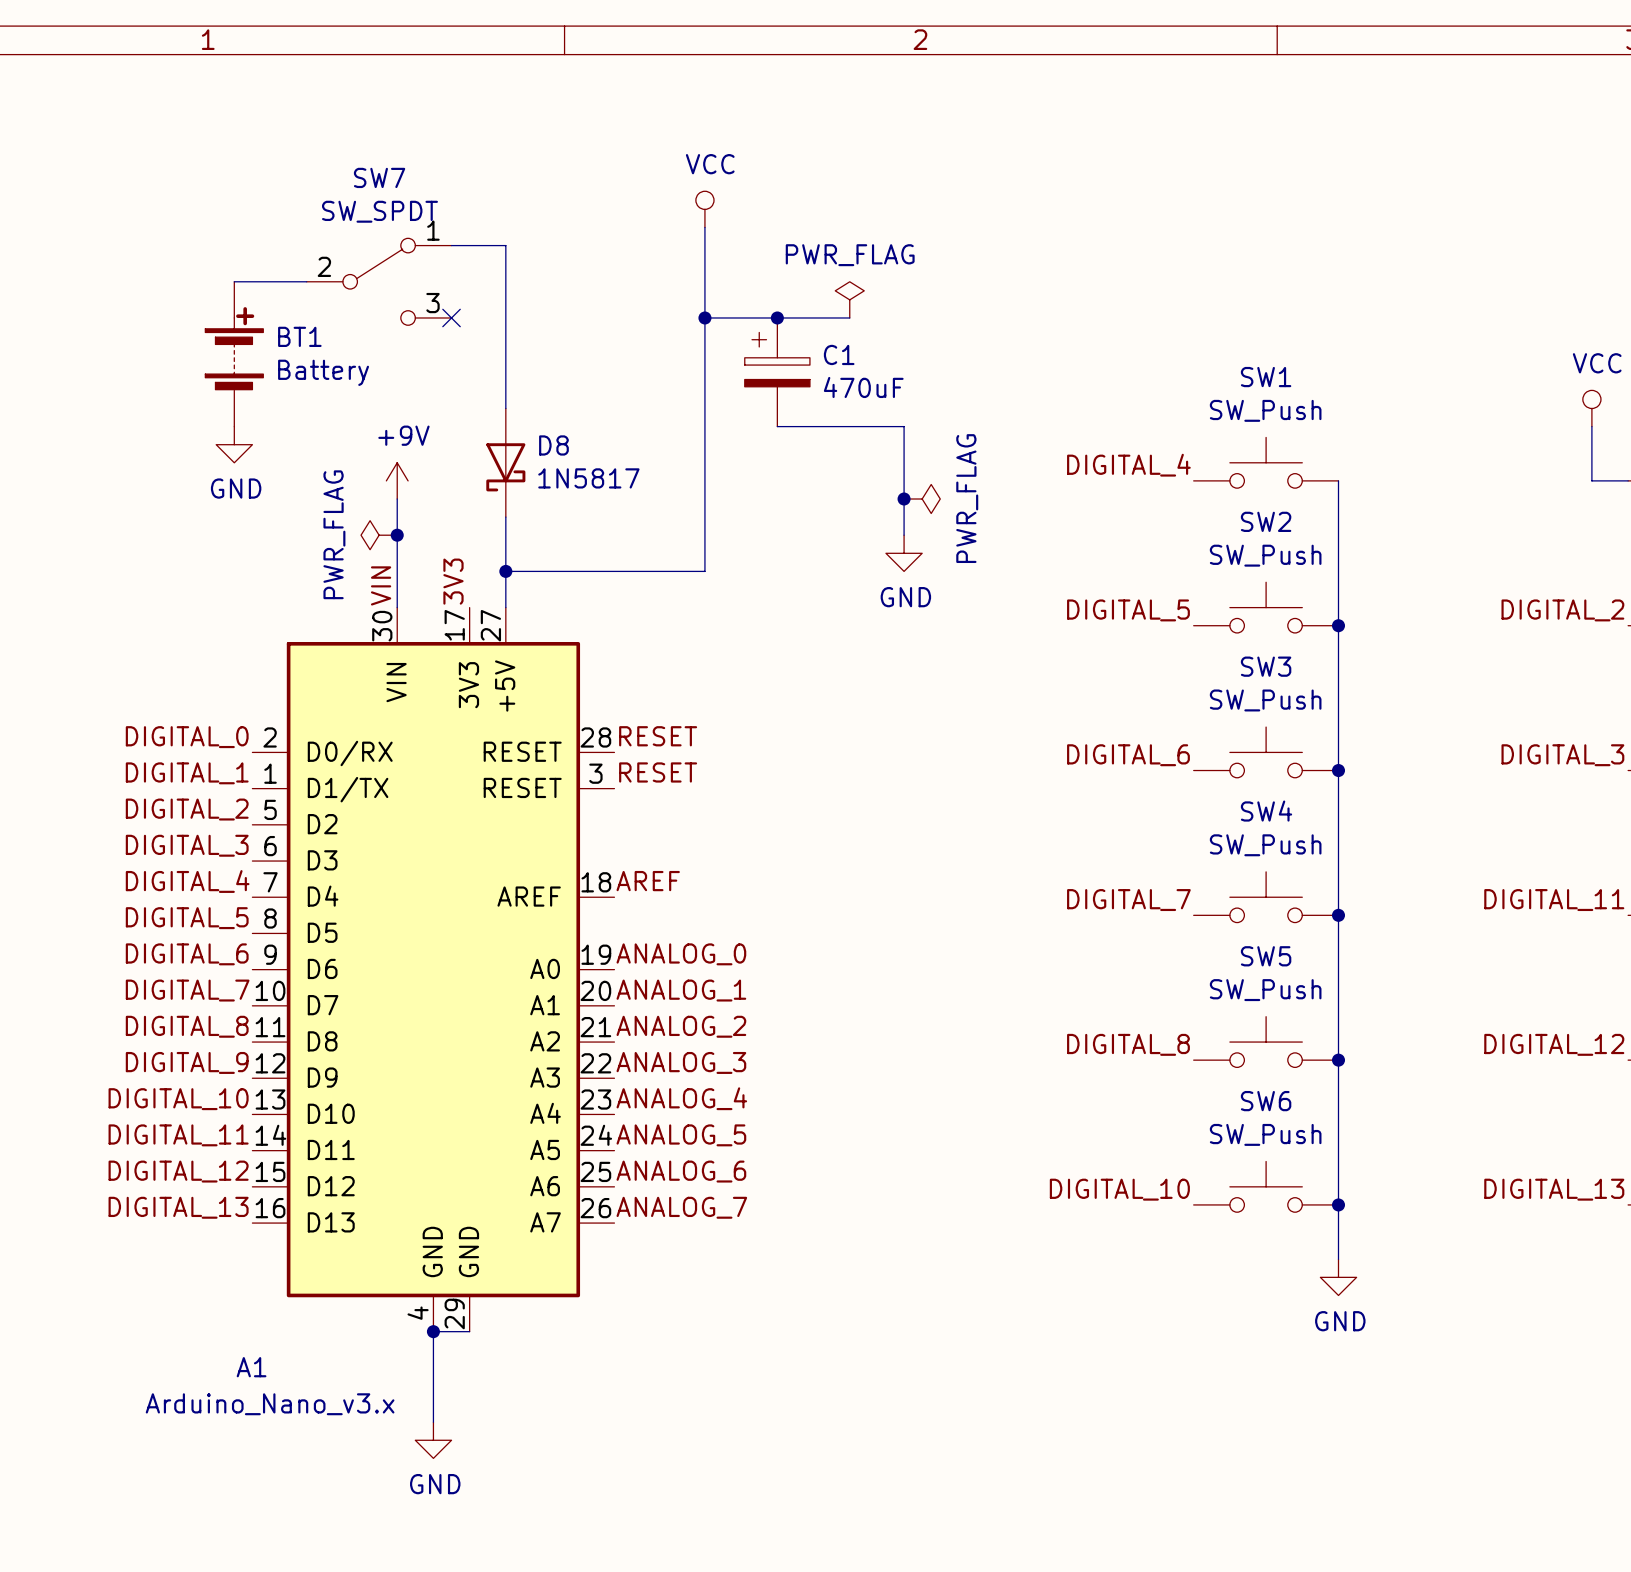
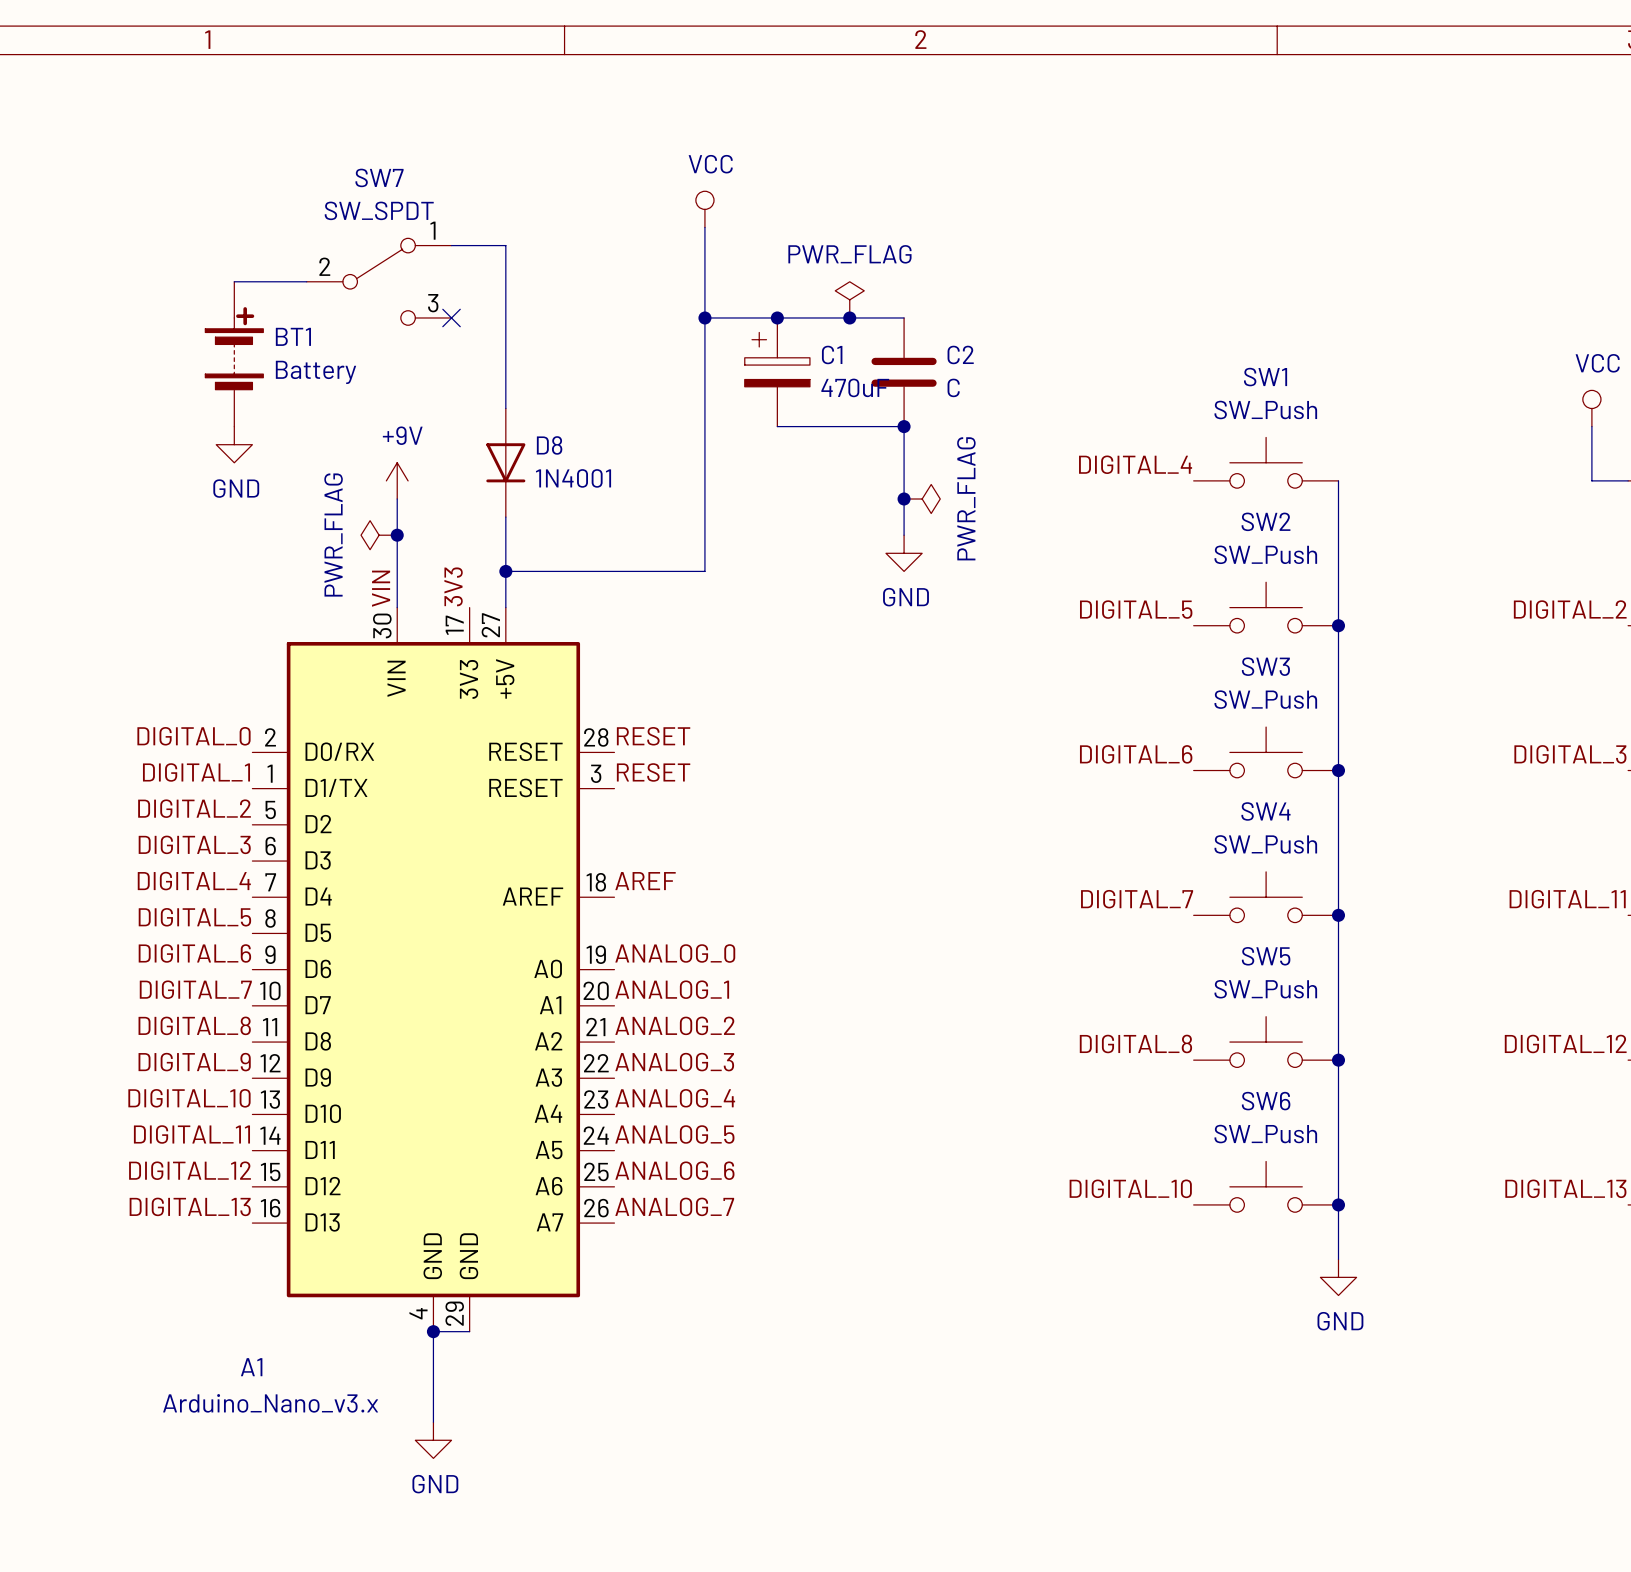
wire: none -> (849, 317) (904, 317)
junction: none -> (849, 317)
C2: none -> C (904, 372)
D8 symbol: [486, 408, 526, 518] -> [486, 408, 526, 518]
junction: none -> (904, 426)
D8 value: 1N5817 (588, 478) -> 1N4001 (573, 478)

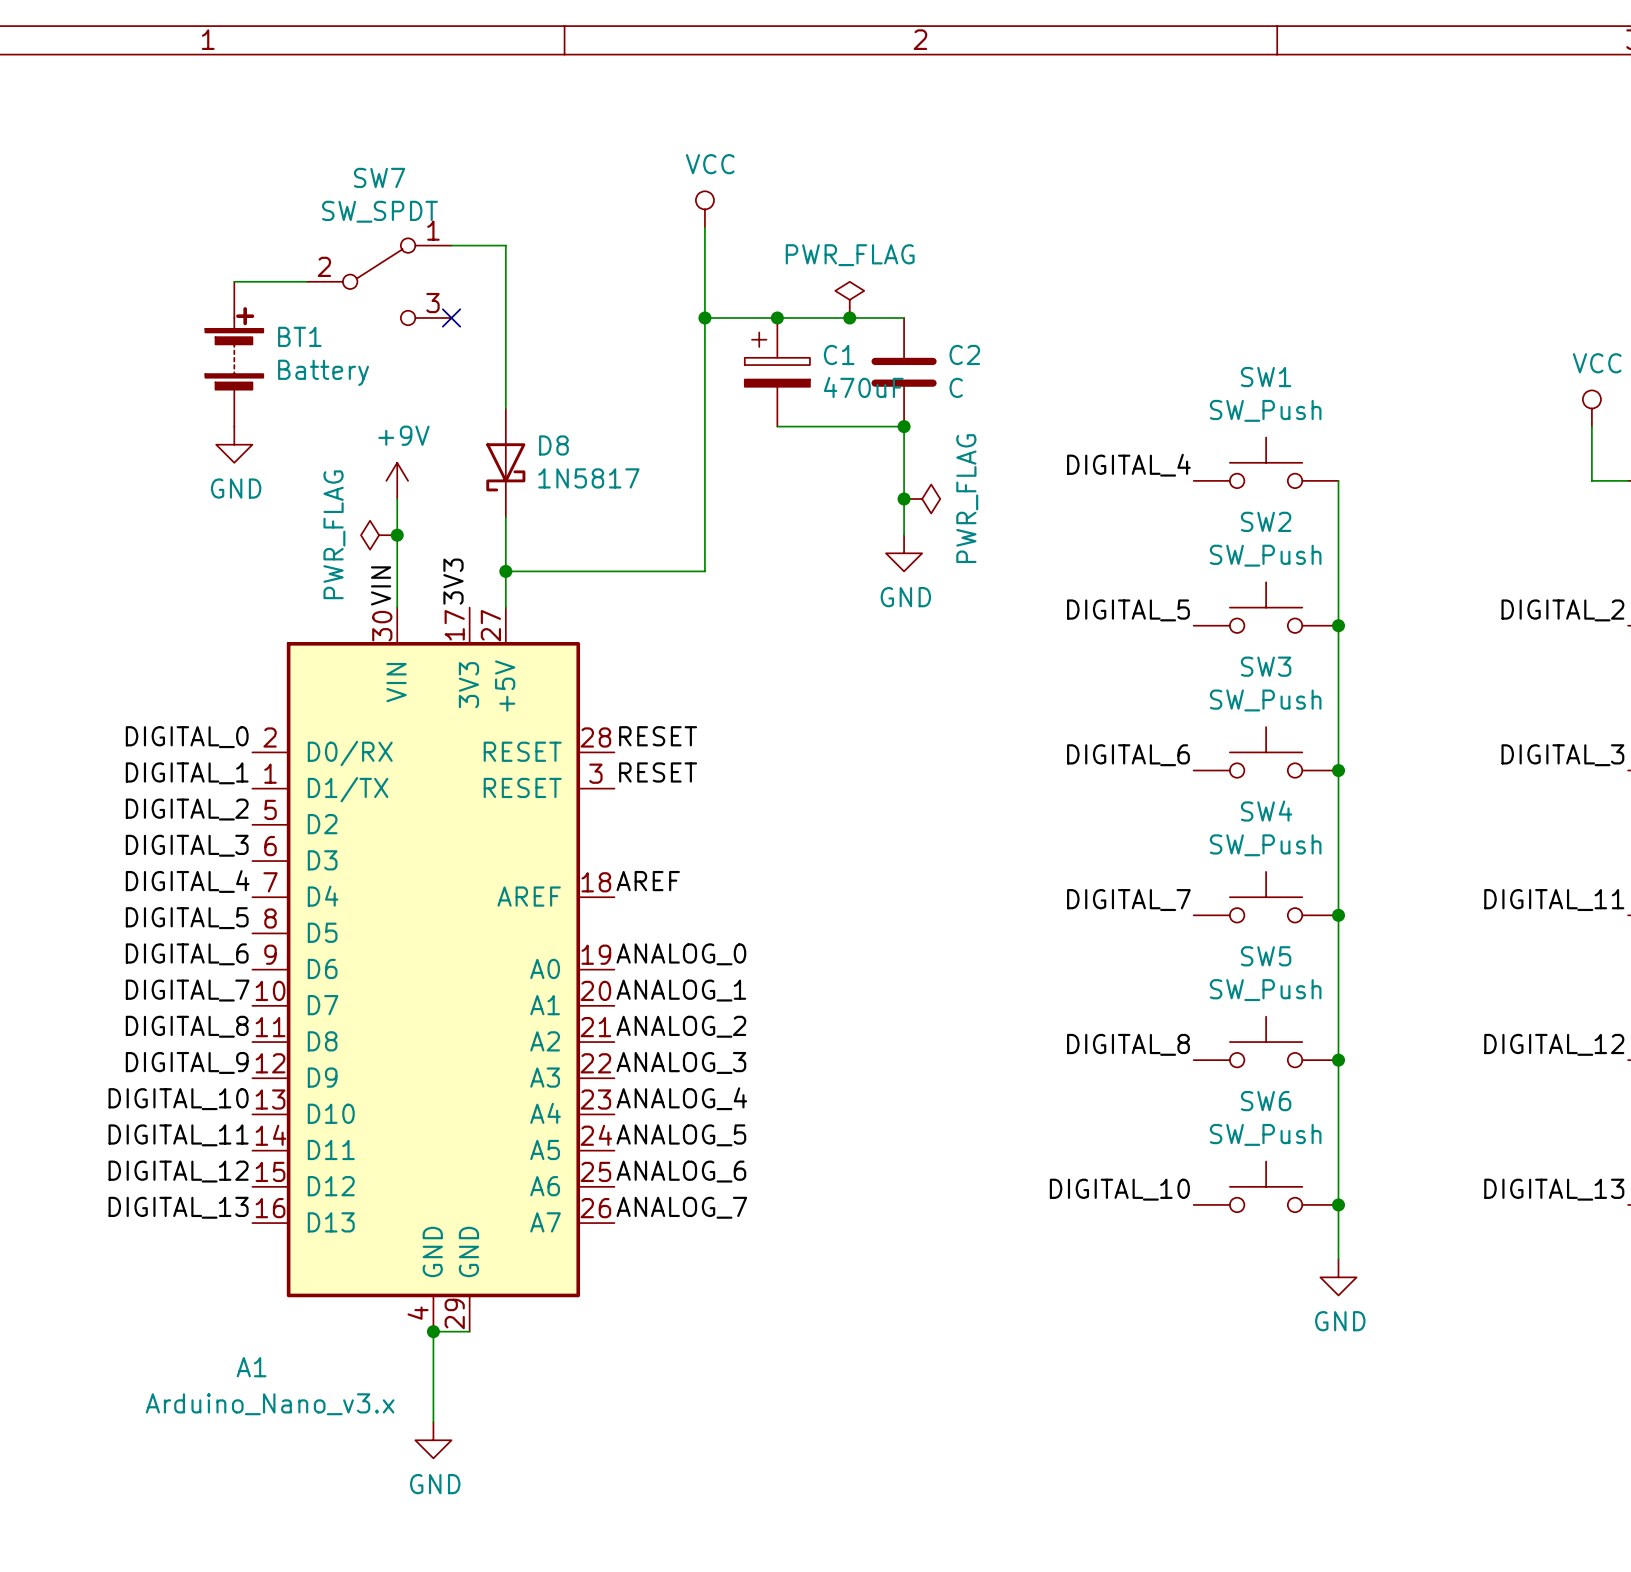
D8 symbol: [486, 408, 526, 518] -> [486, 408, 526, 518]
D8 value: 1N4001 (573, 478) -> 1N5817 (588, 478)

